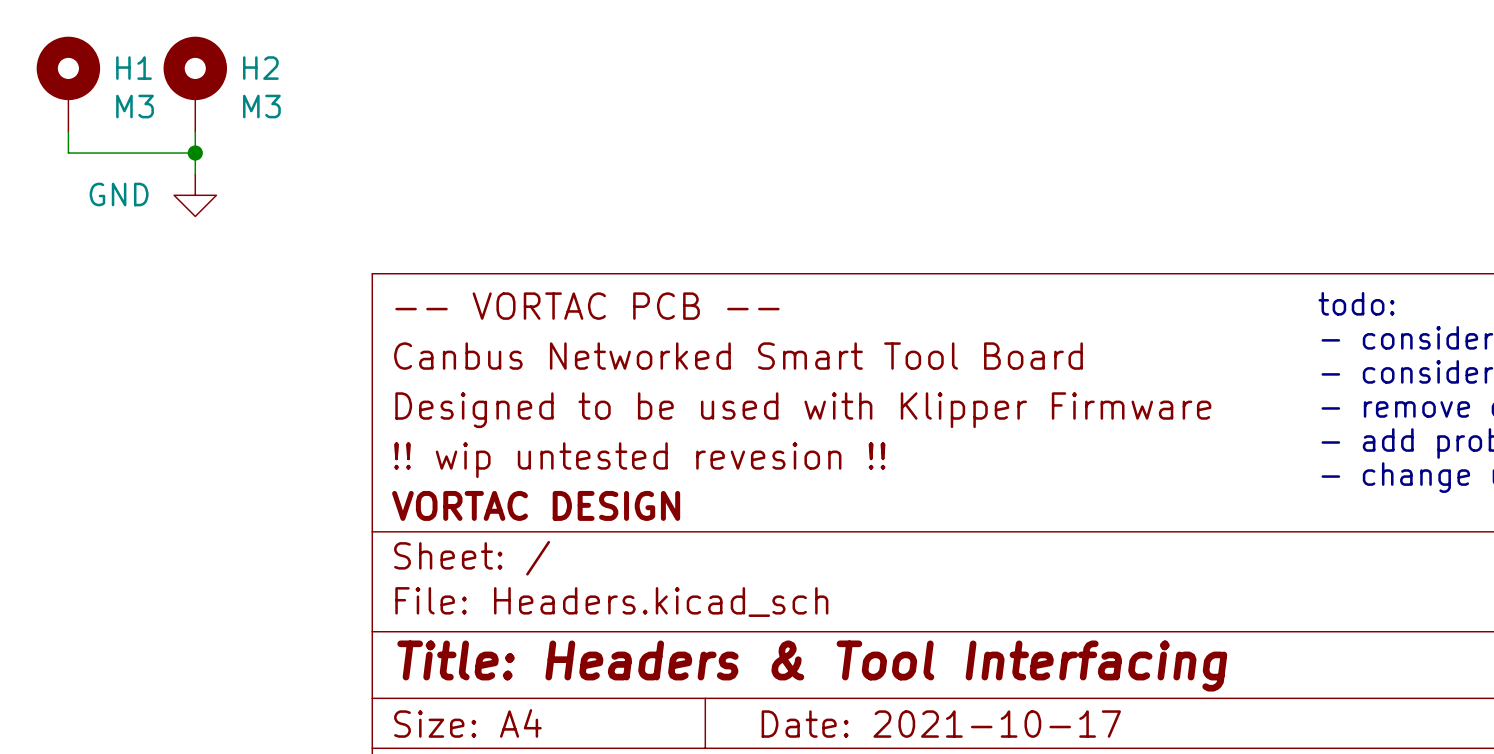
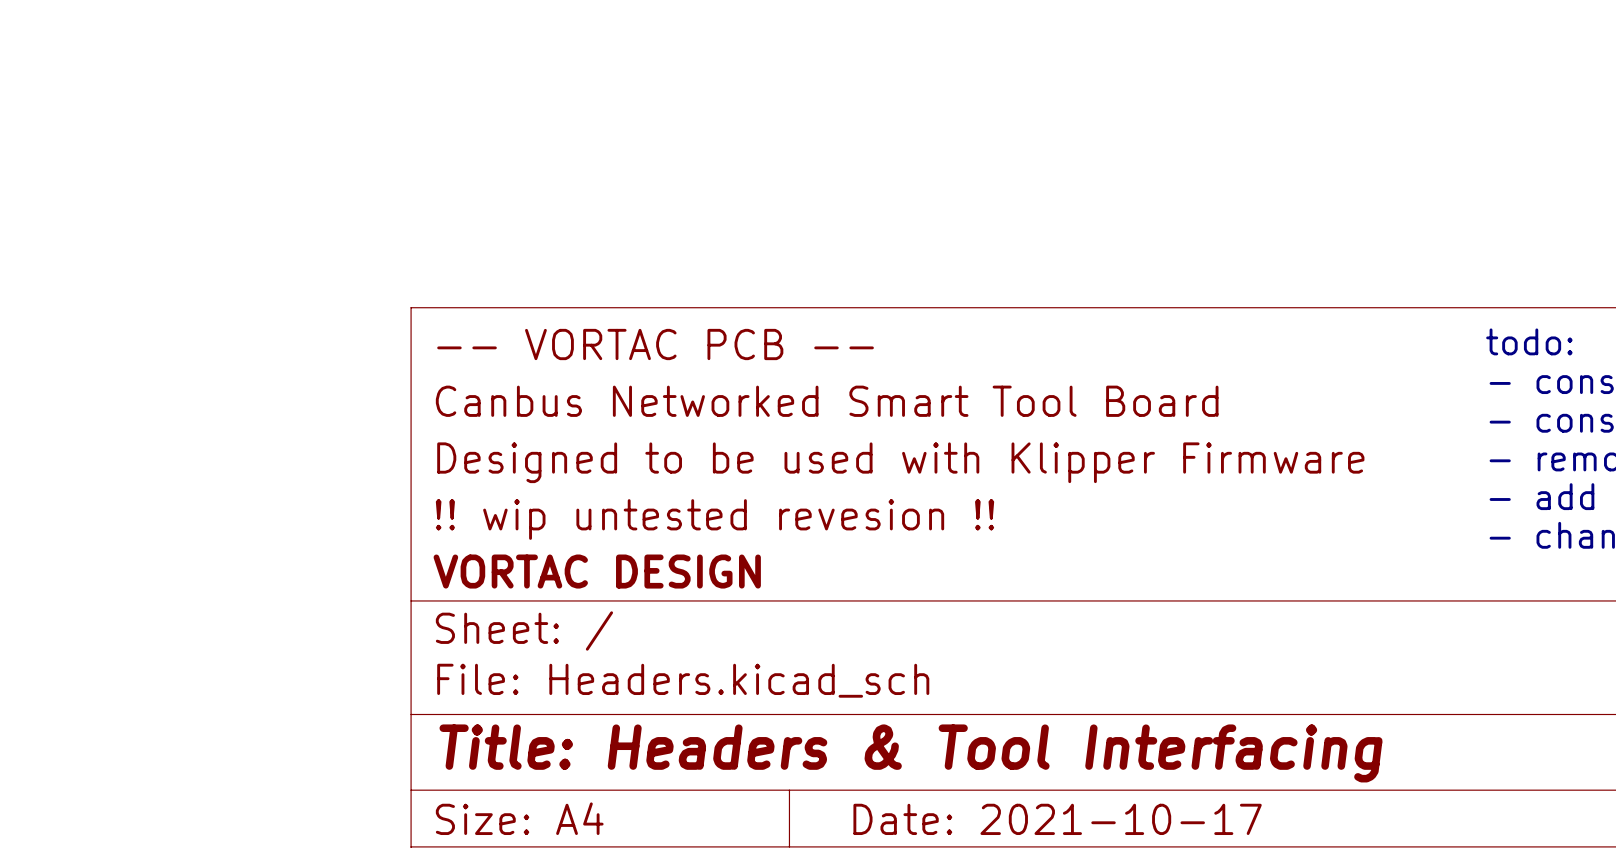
H1: M3 (68, 84) -> none
H2: M3 (195, 84) -> none
wire: (68, 131) (68, 153) (195, 153) -> none
wire: (195, 131) (195, 174) -> none
junction: (195, 153) -> none
power symbol: GND (195, 195) -> none

